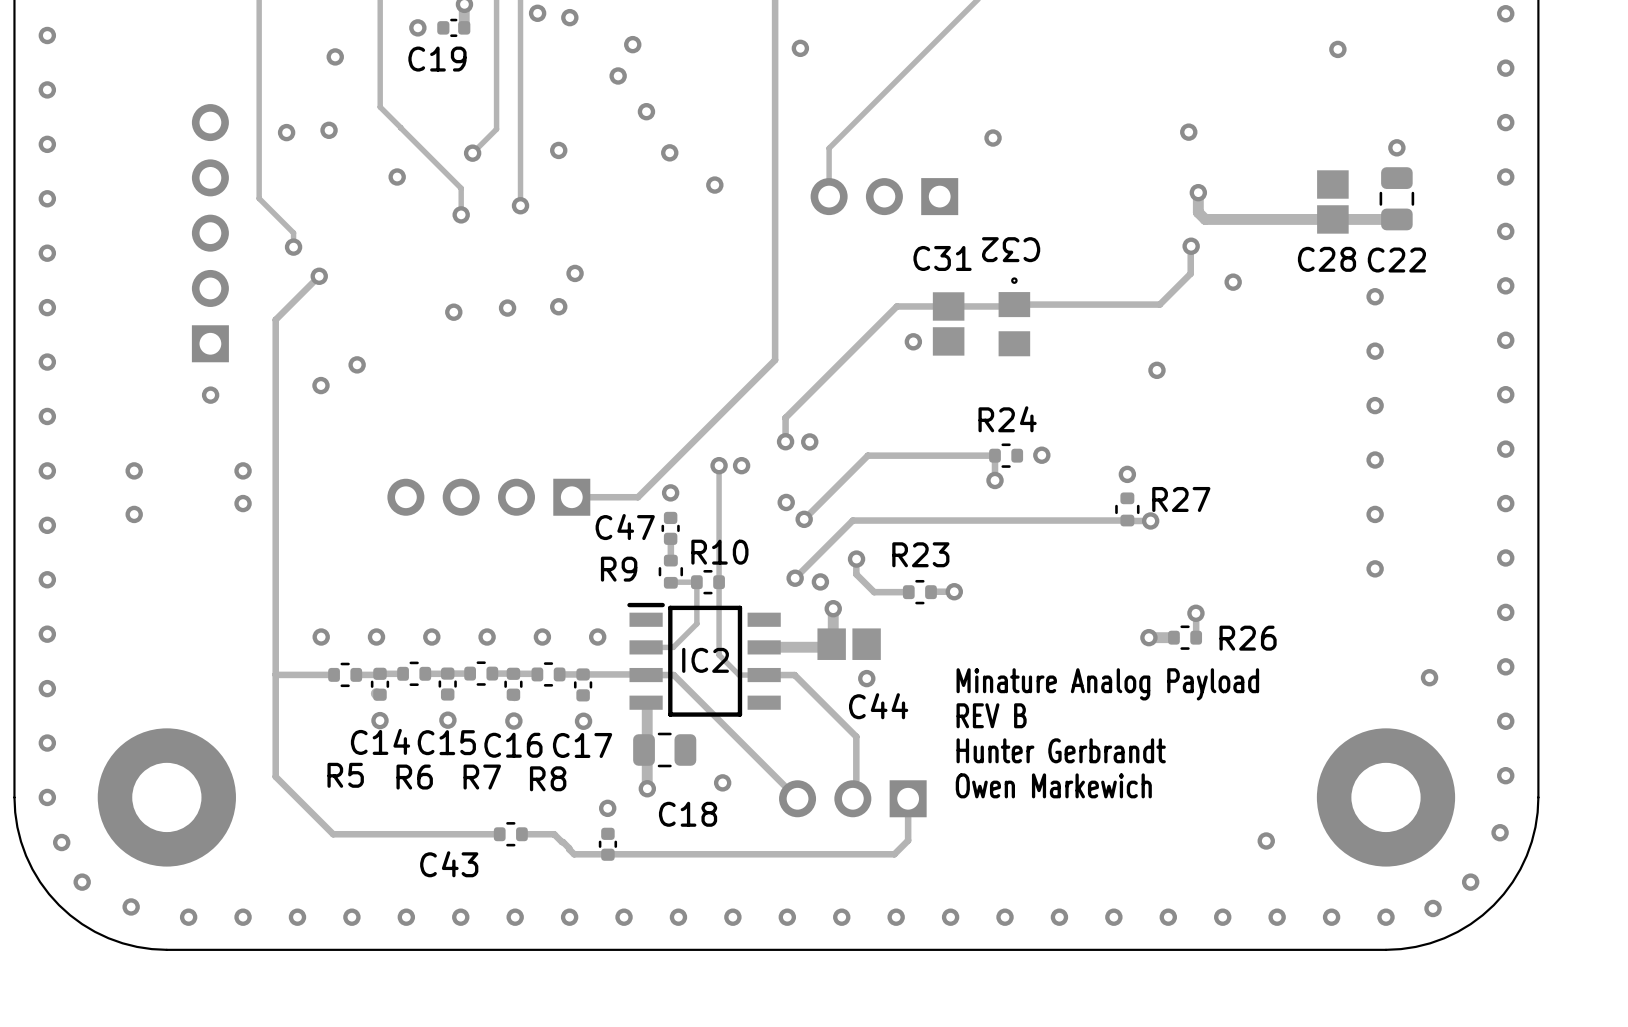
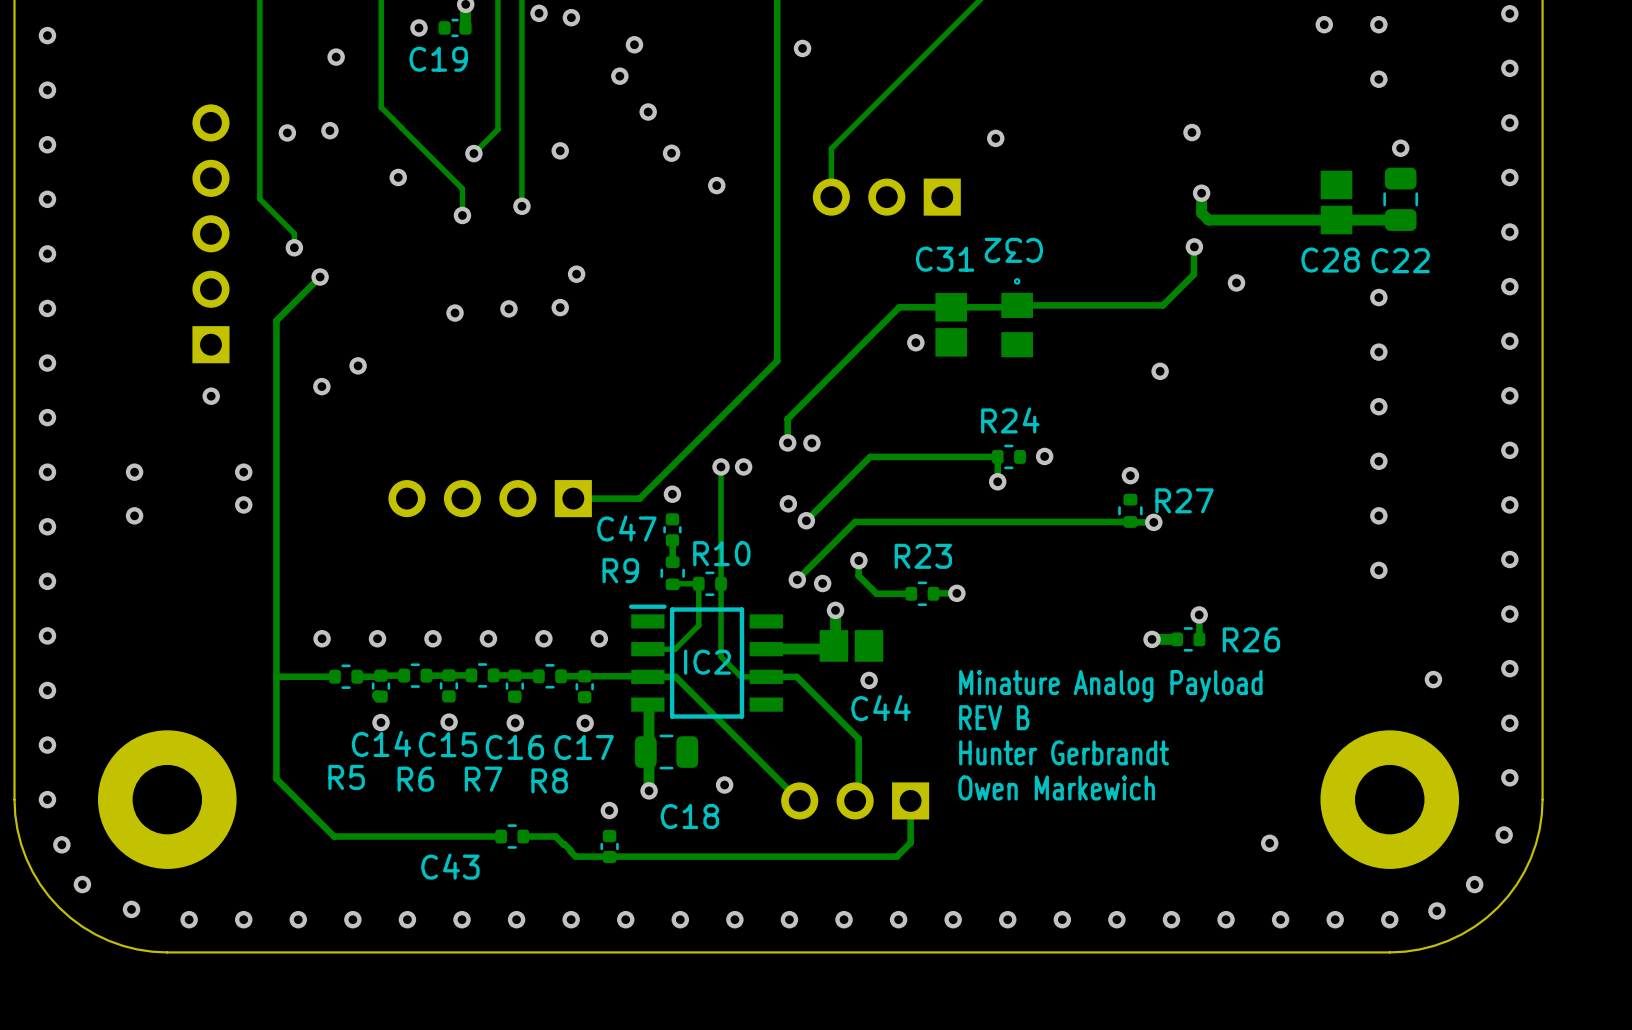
via: none -> (1324, 24)
via: none -> (1378, 24)
via: (1337, 49) -> none
via: none -> (1378, 79)

